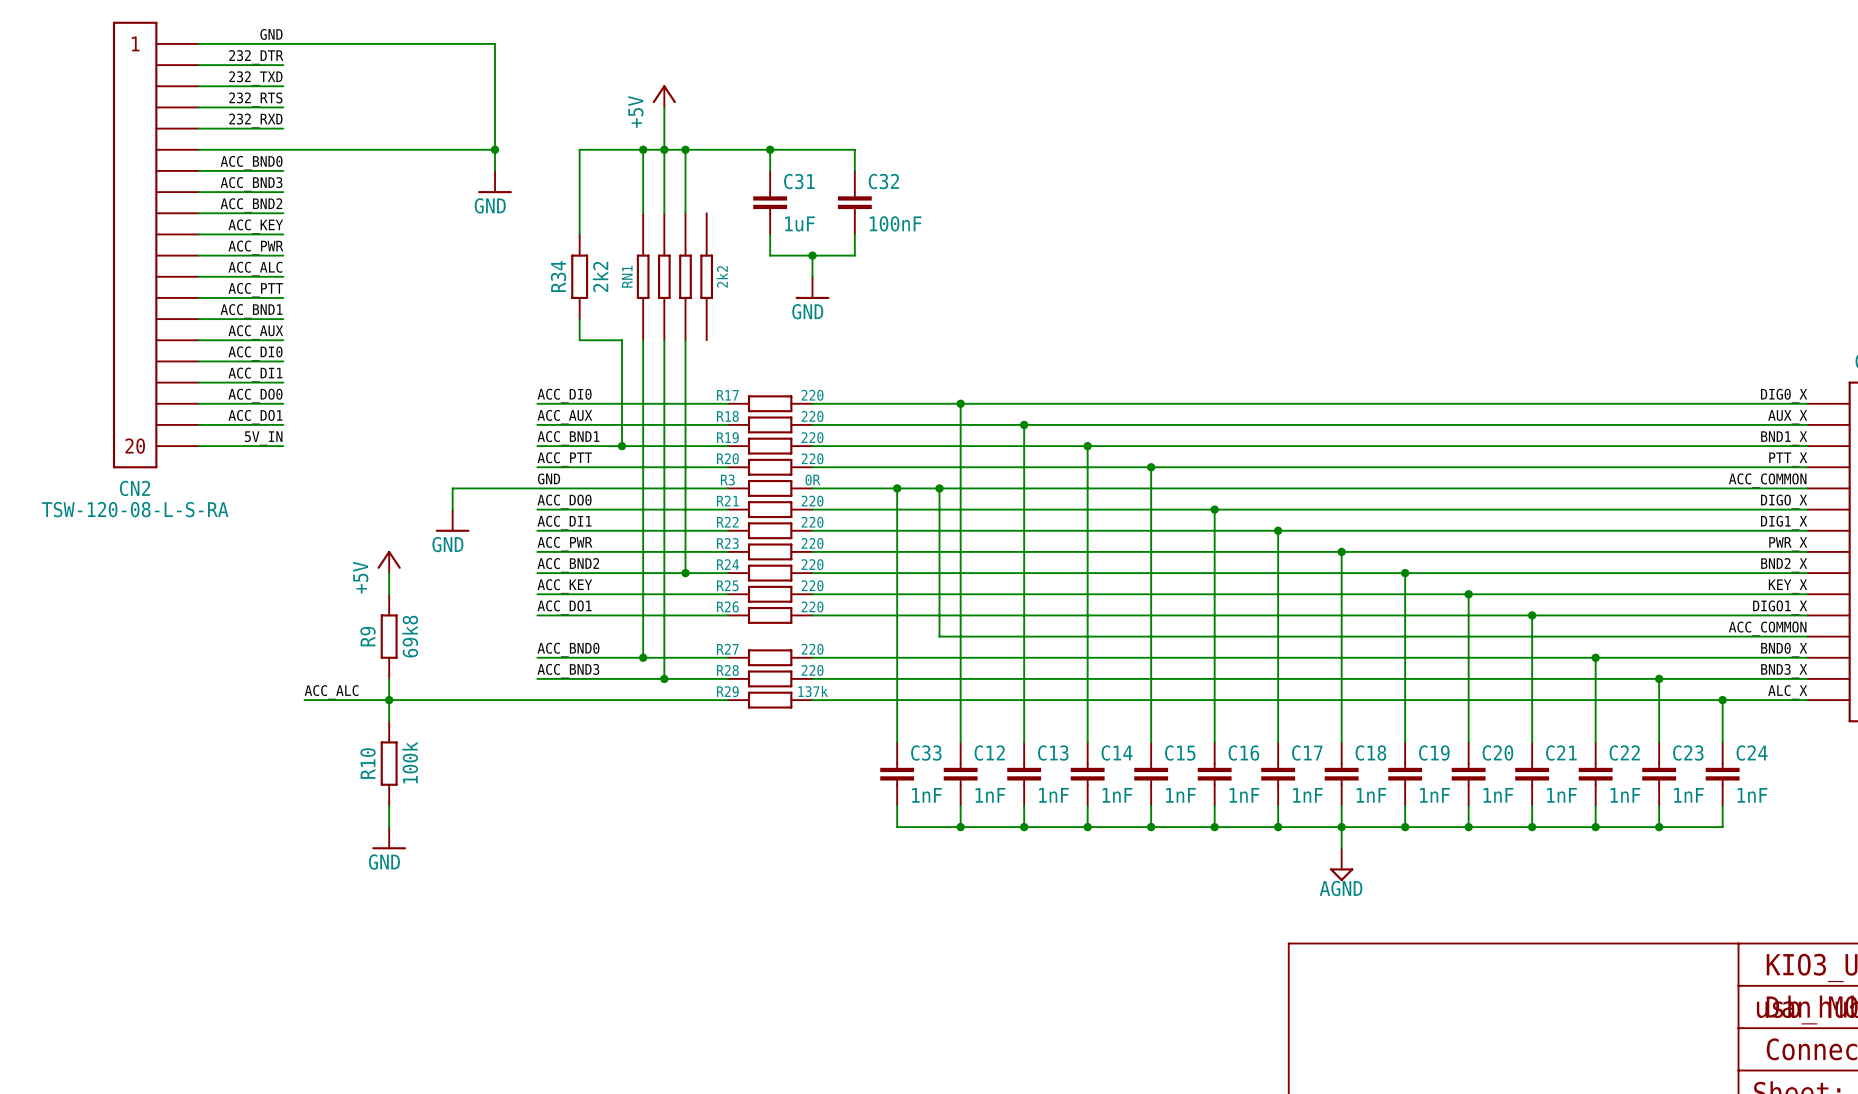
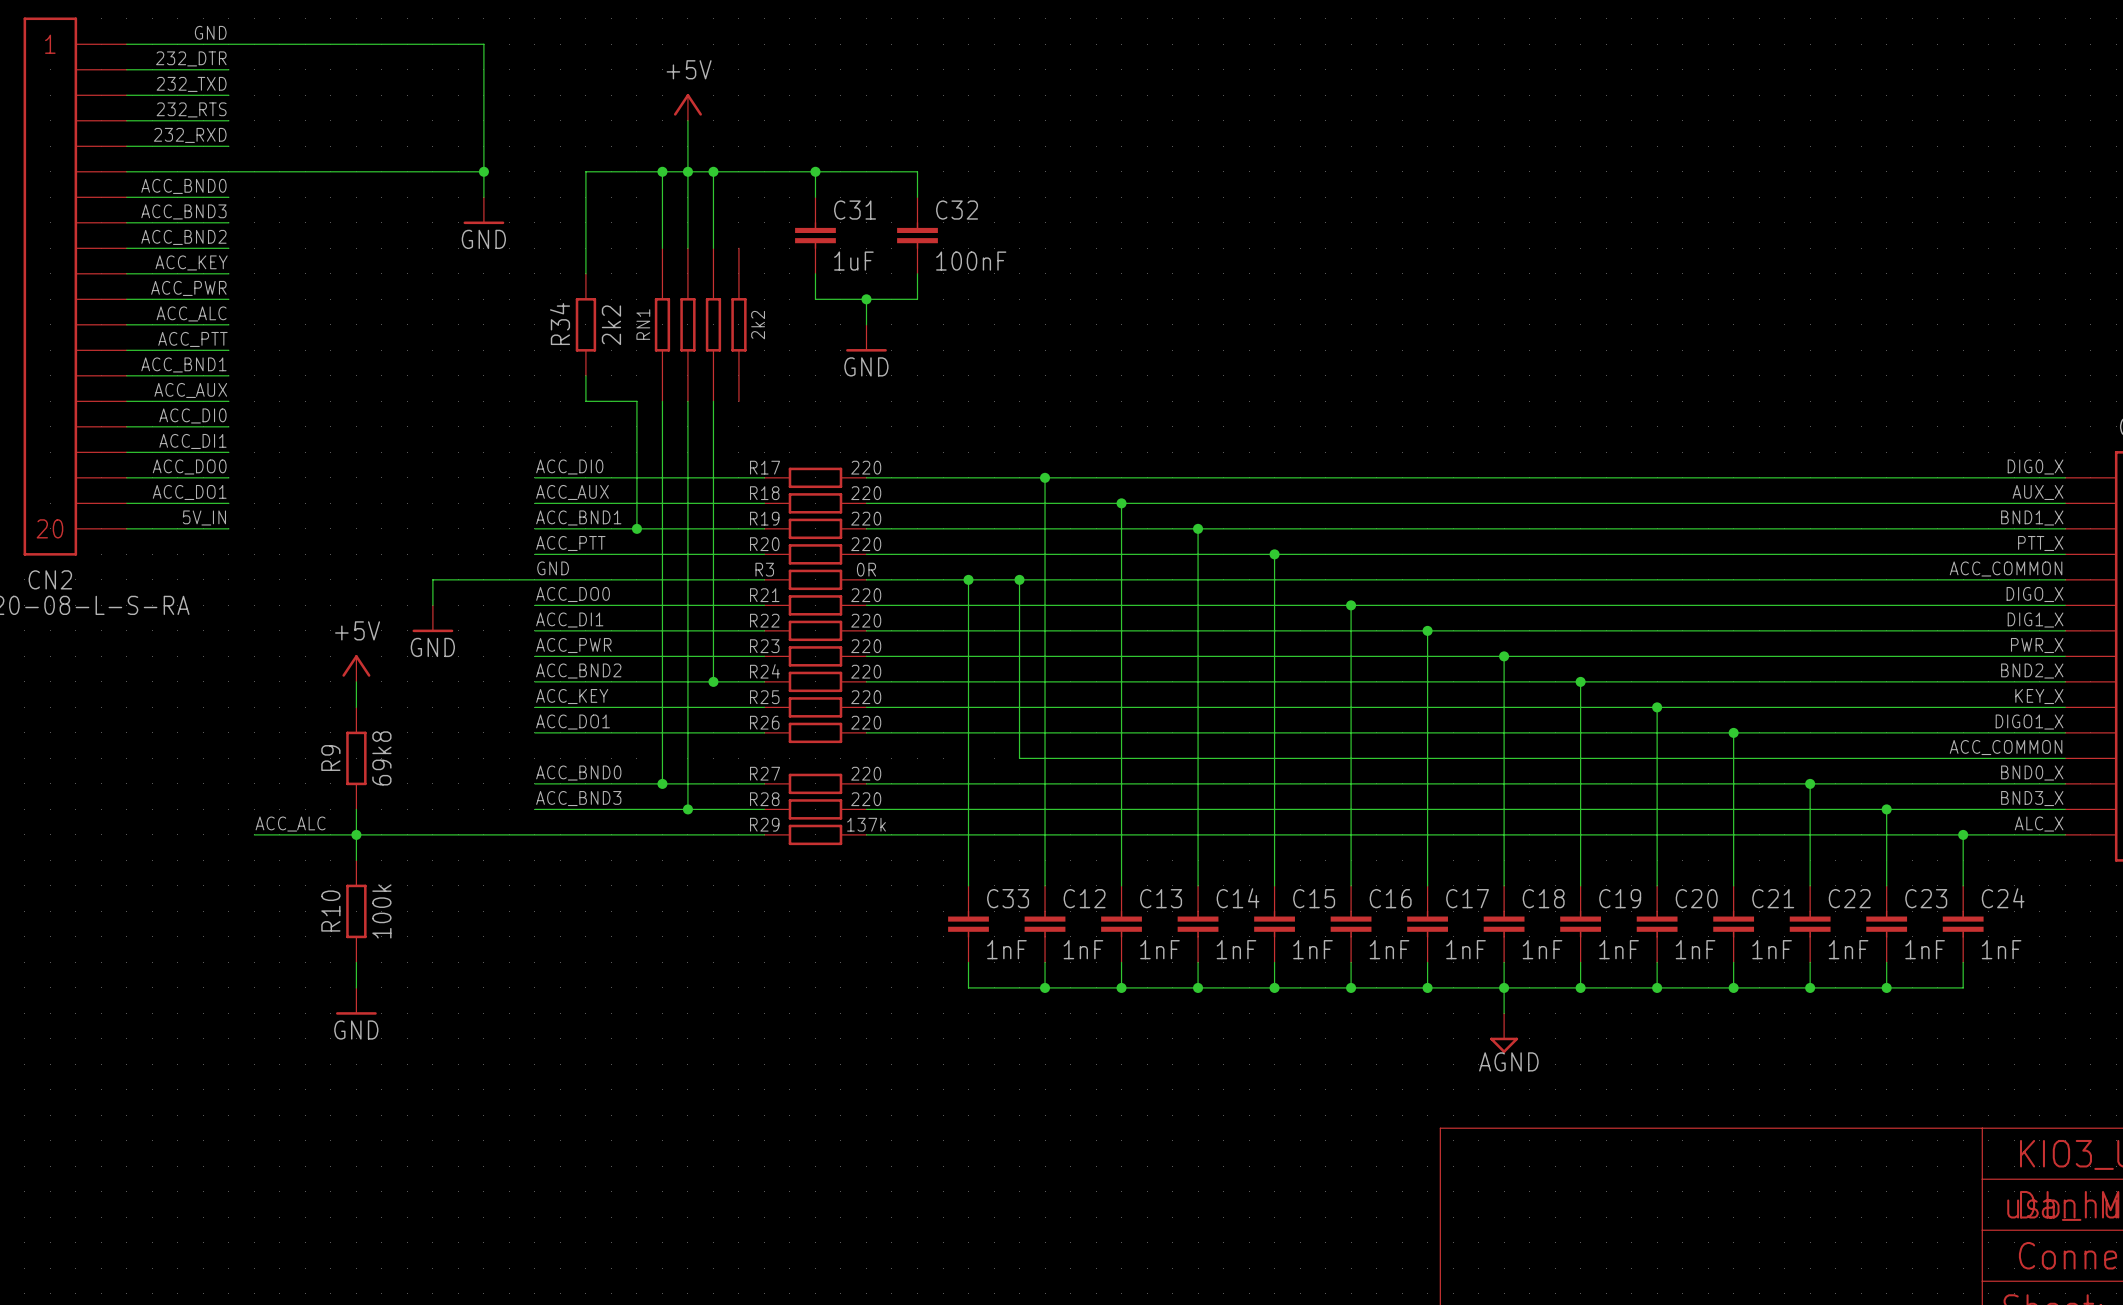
power symbol text rotation: 0° (635, 111) -> 90° clockwise (689, 69)
power symbol text rotation: 0° (360, 577) -> 90° clockwise (357, 630)

